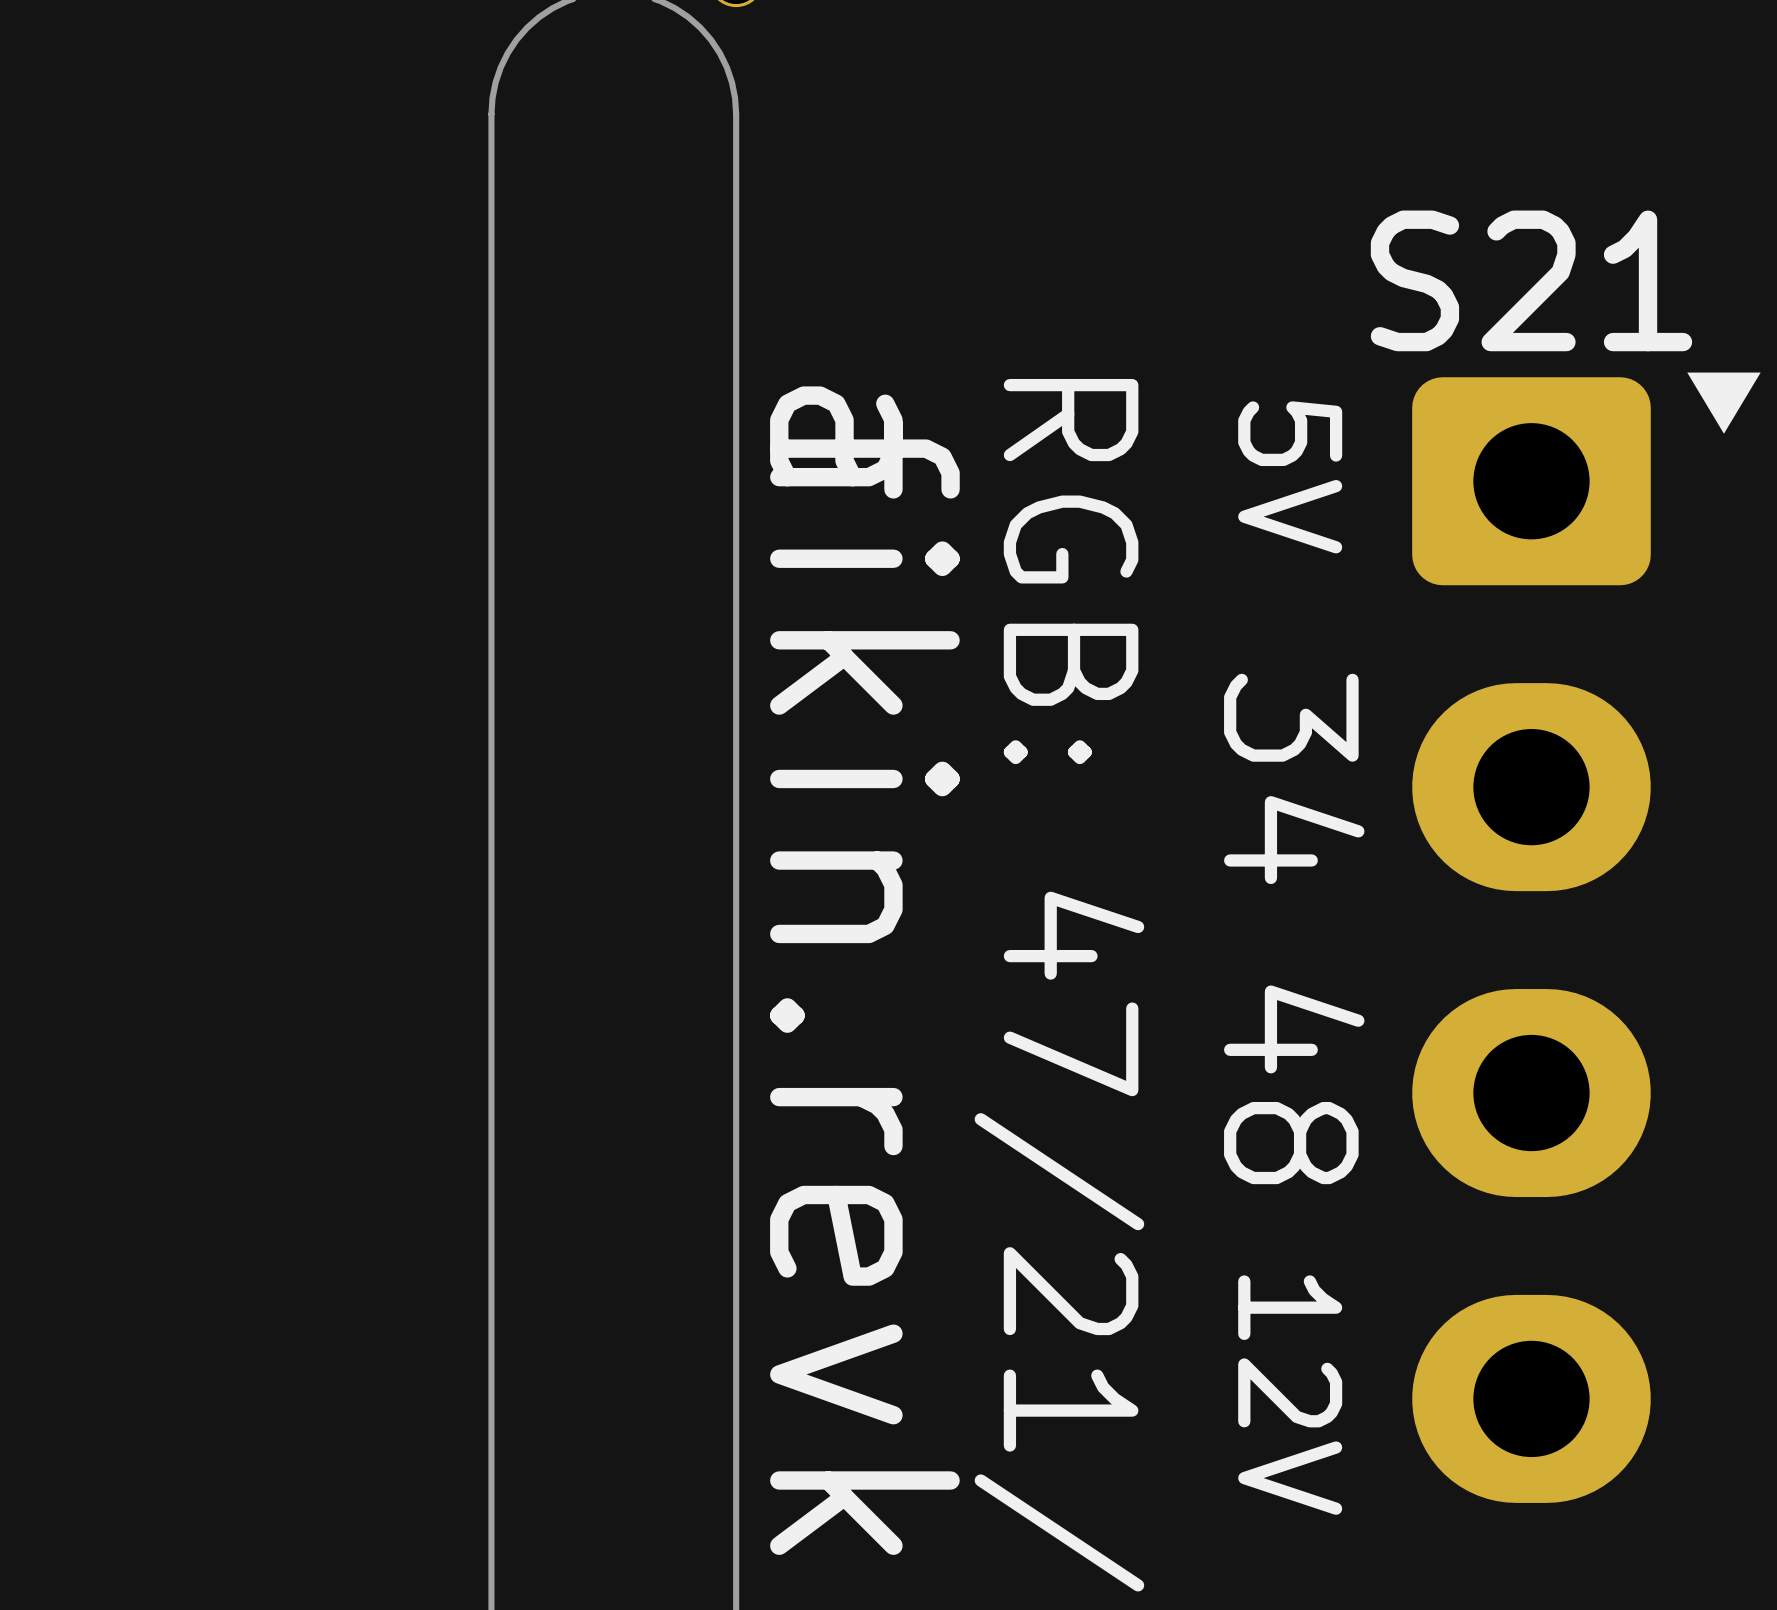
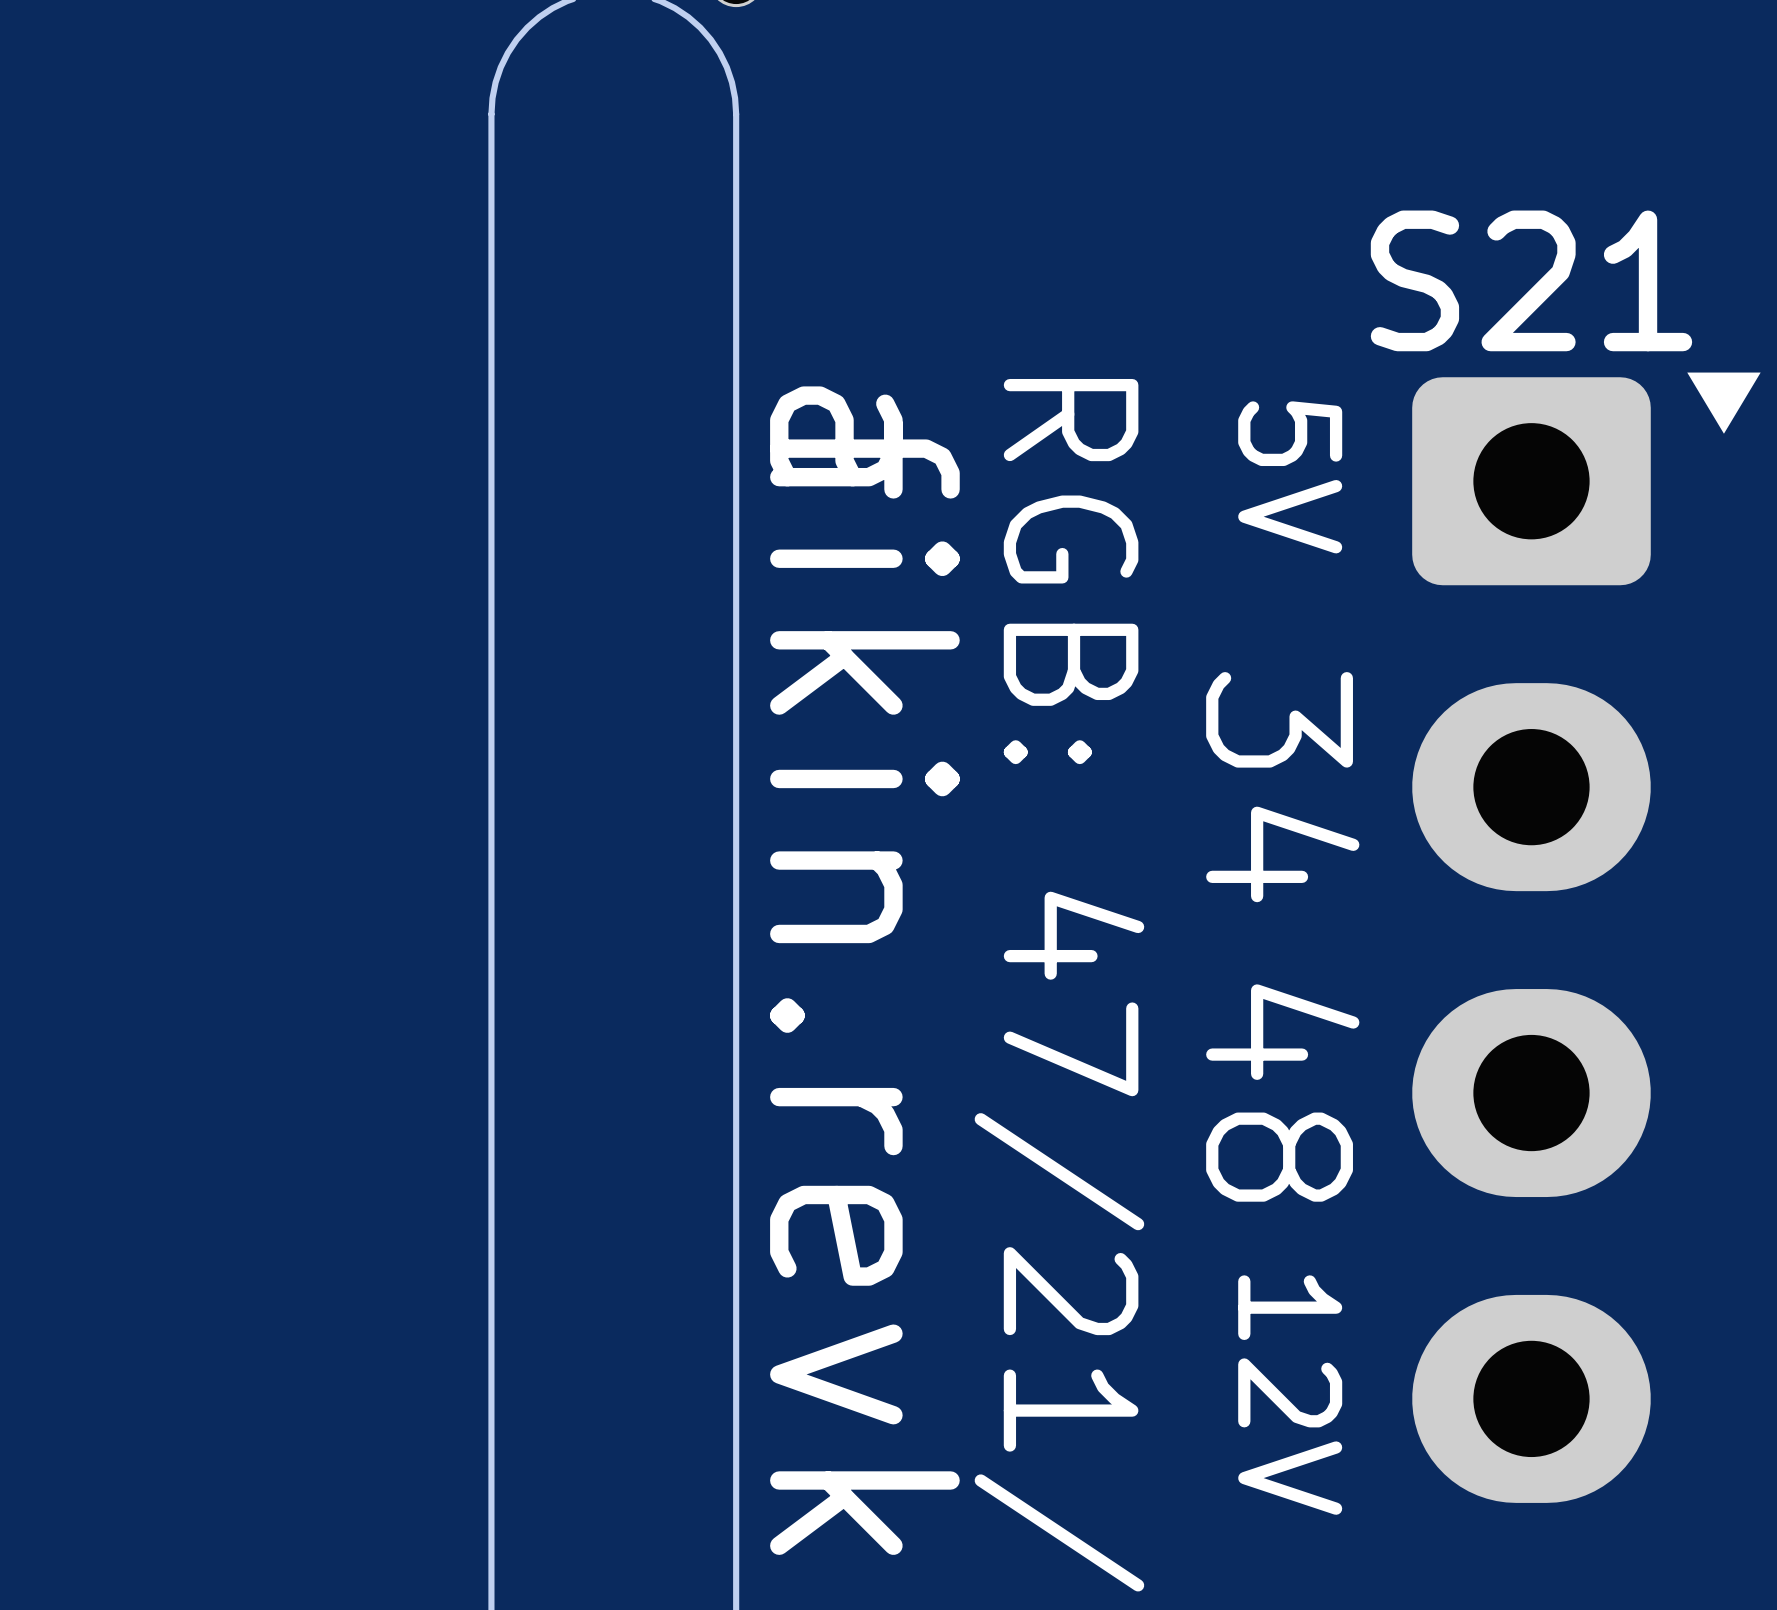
text position: 34 (1294, 778) -> 34 (1282, 787)
text position: 48 (1294, 1084) -> 48 (1282, 1093)

